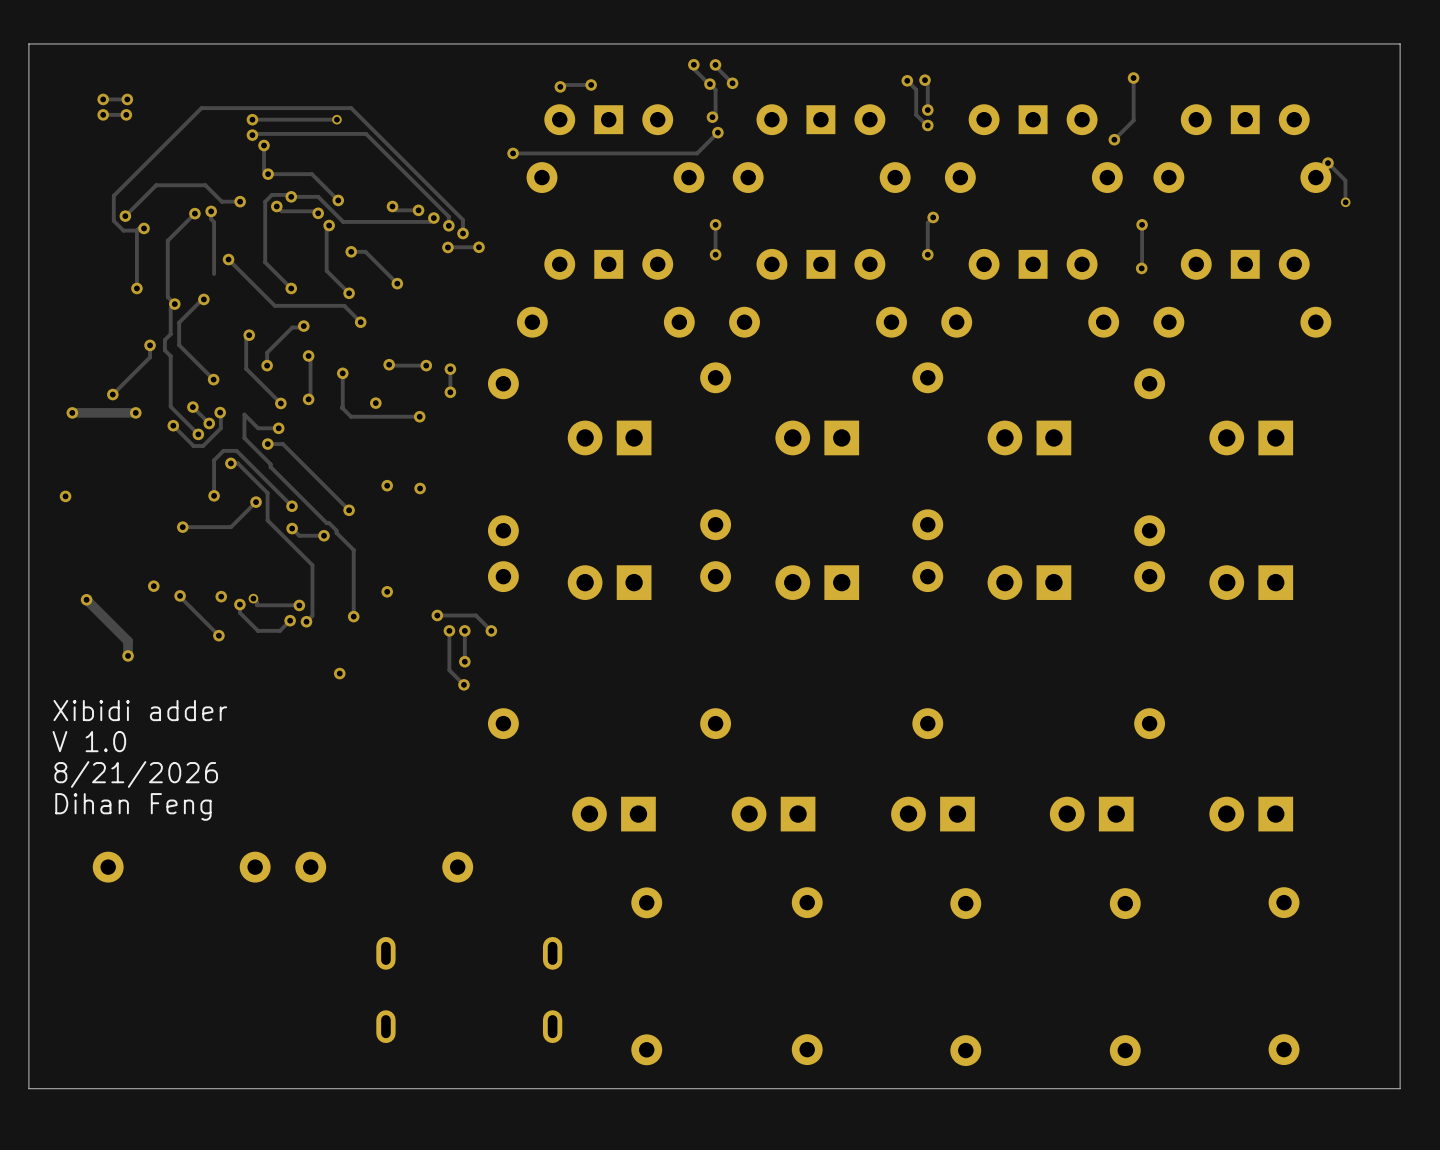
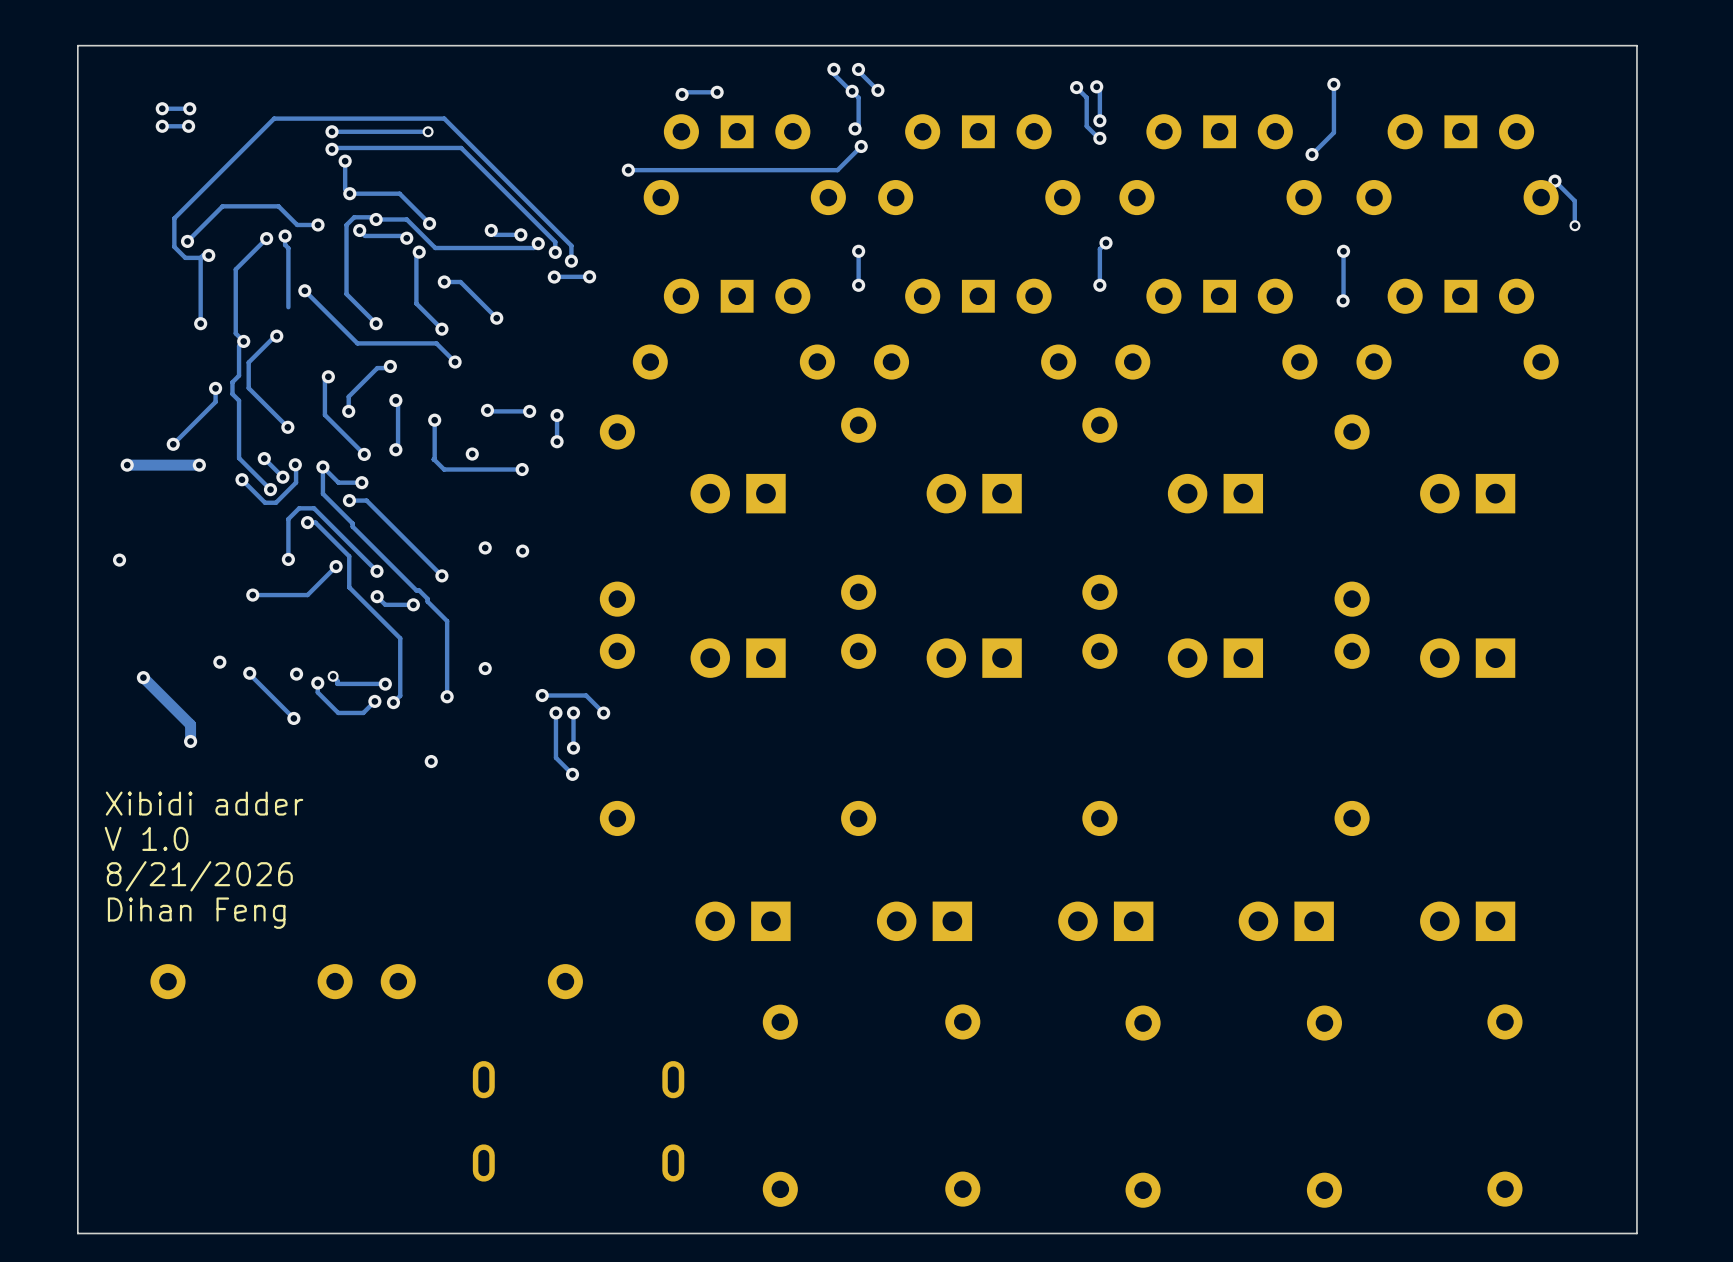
via: none -> (322, 467)

